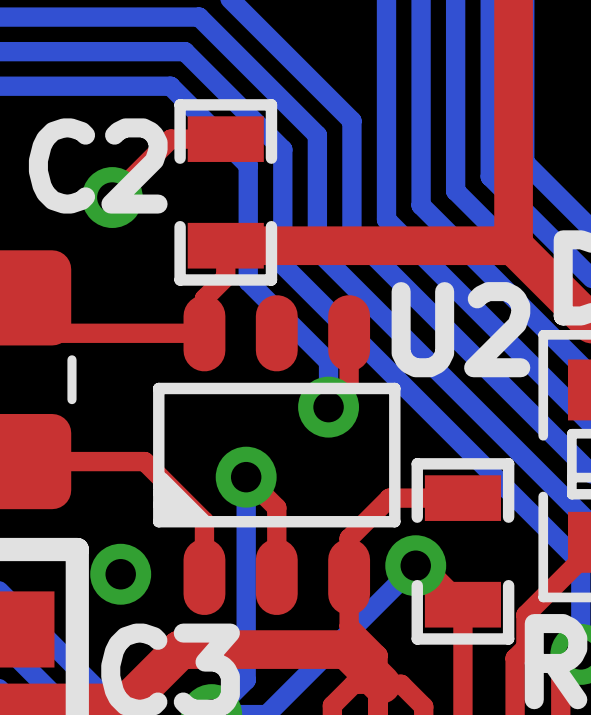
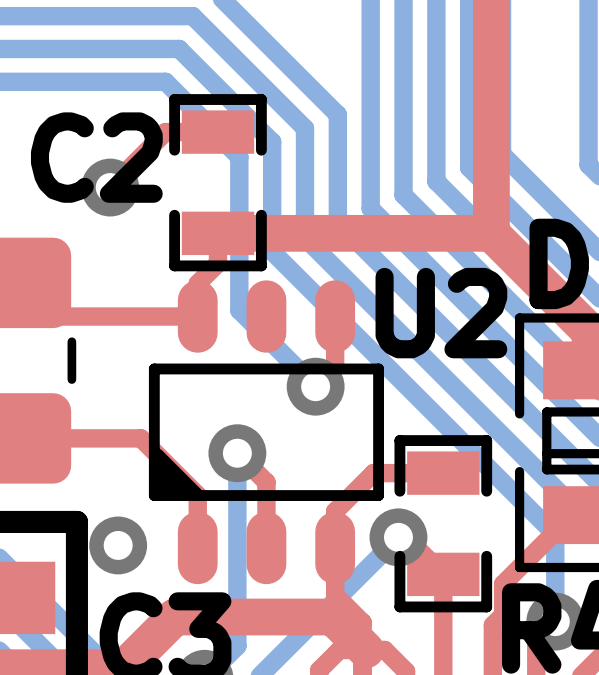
bottom track: (248, 281) (328, 361) (328, 407) -> (239, 267) (239, 310) (315, 386)

